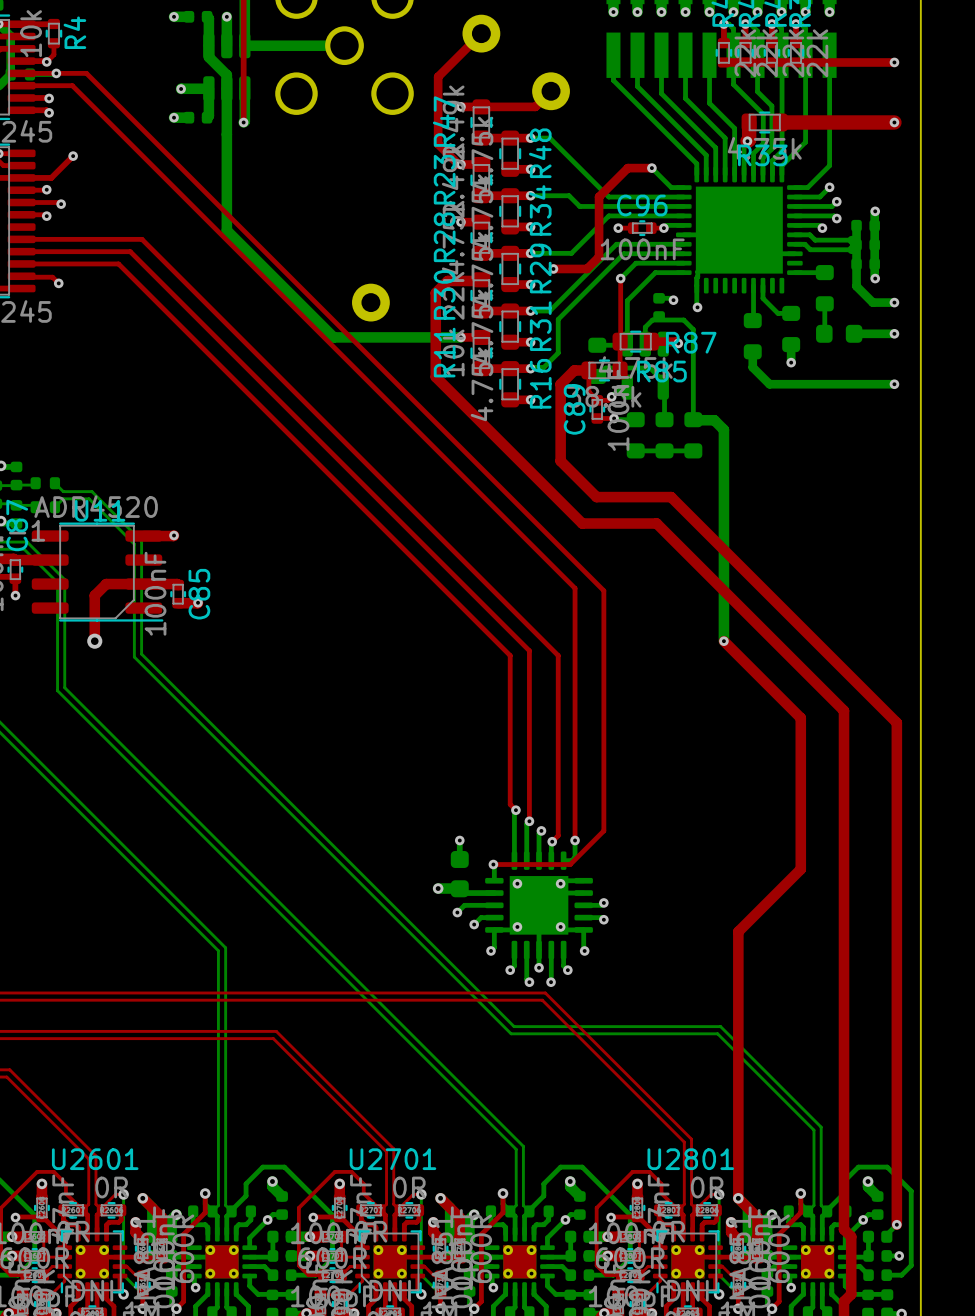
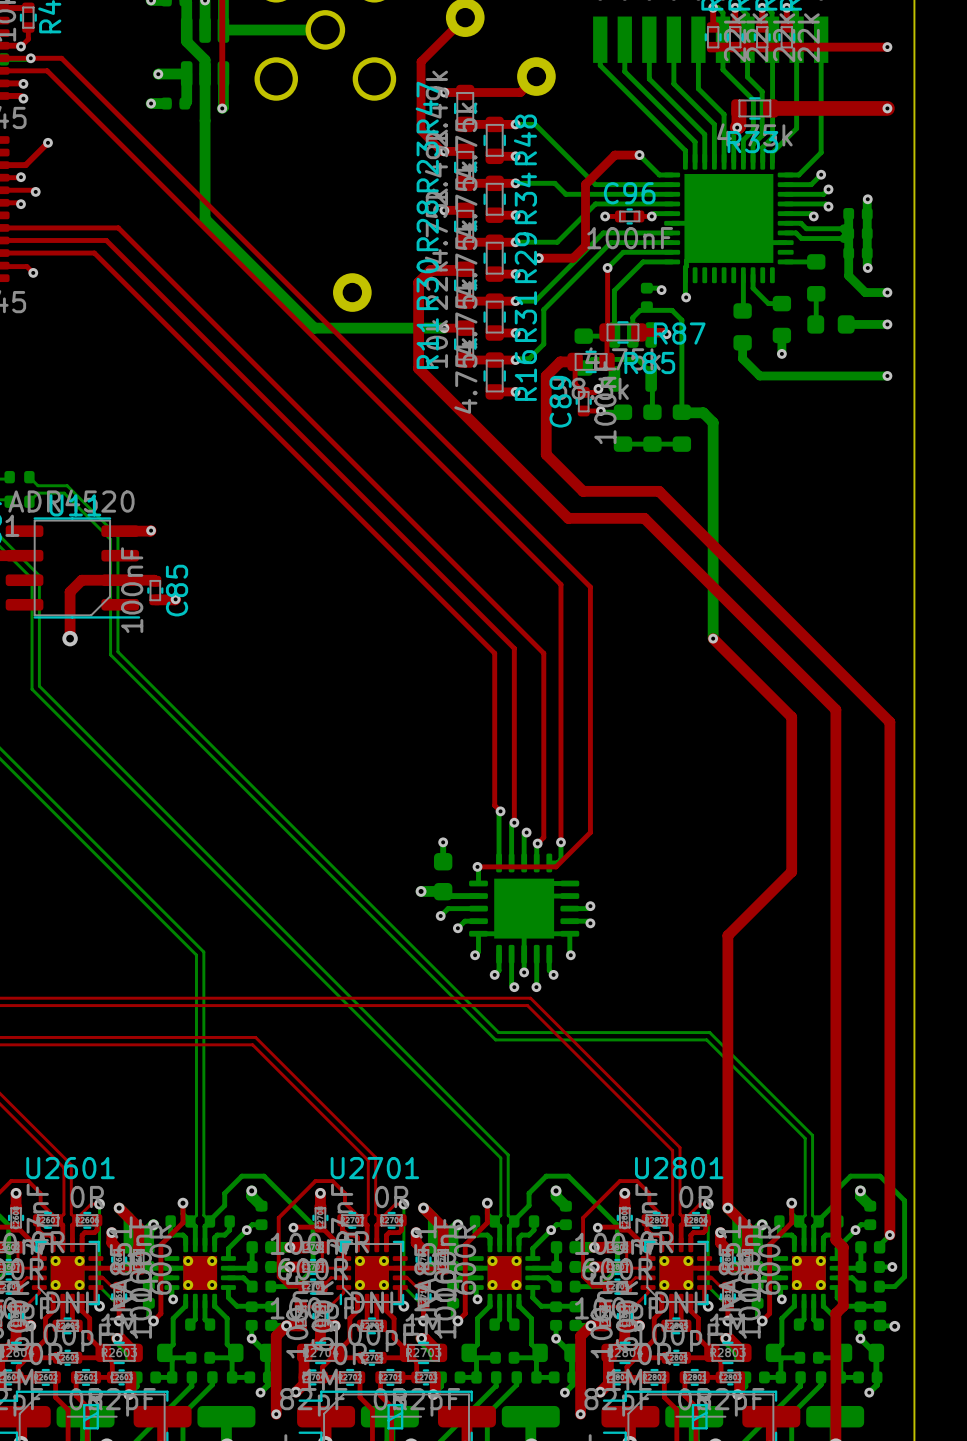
via: (517, 883) -> none
via: (560, 883) -> none
via: (517, 926) -> none
via: (560, 926) -> none

